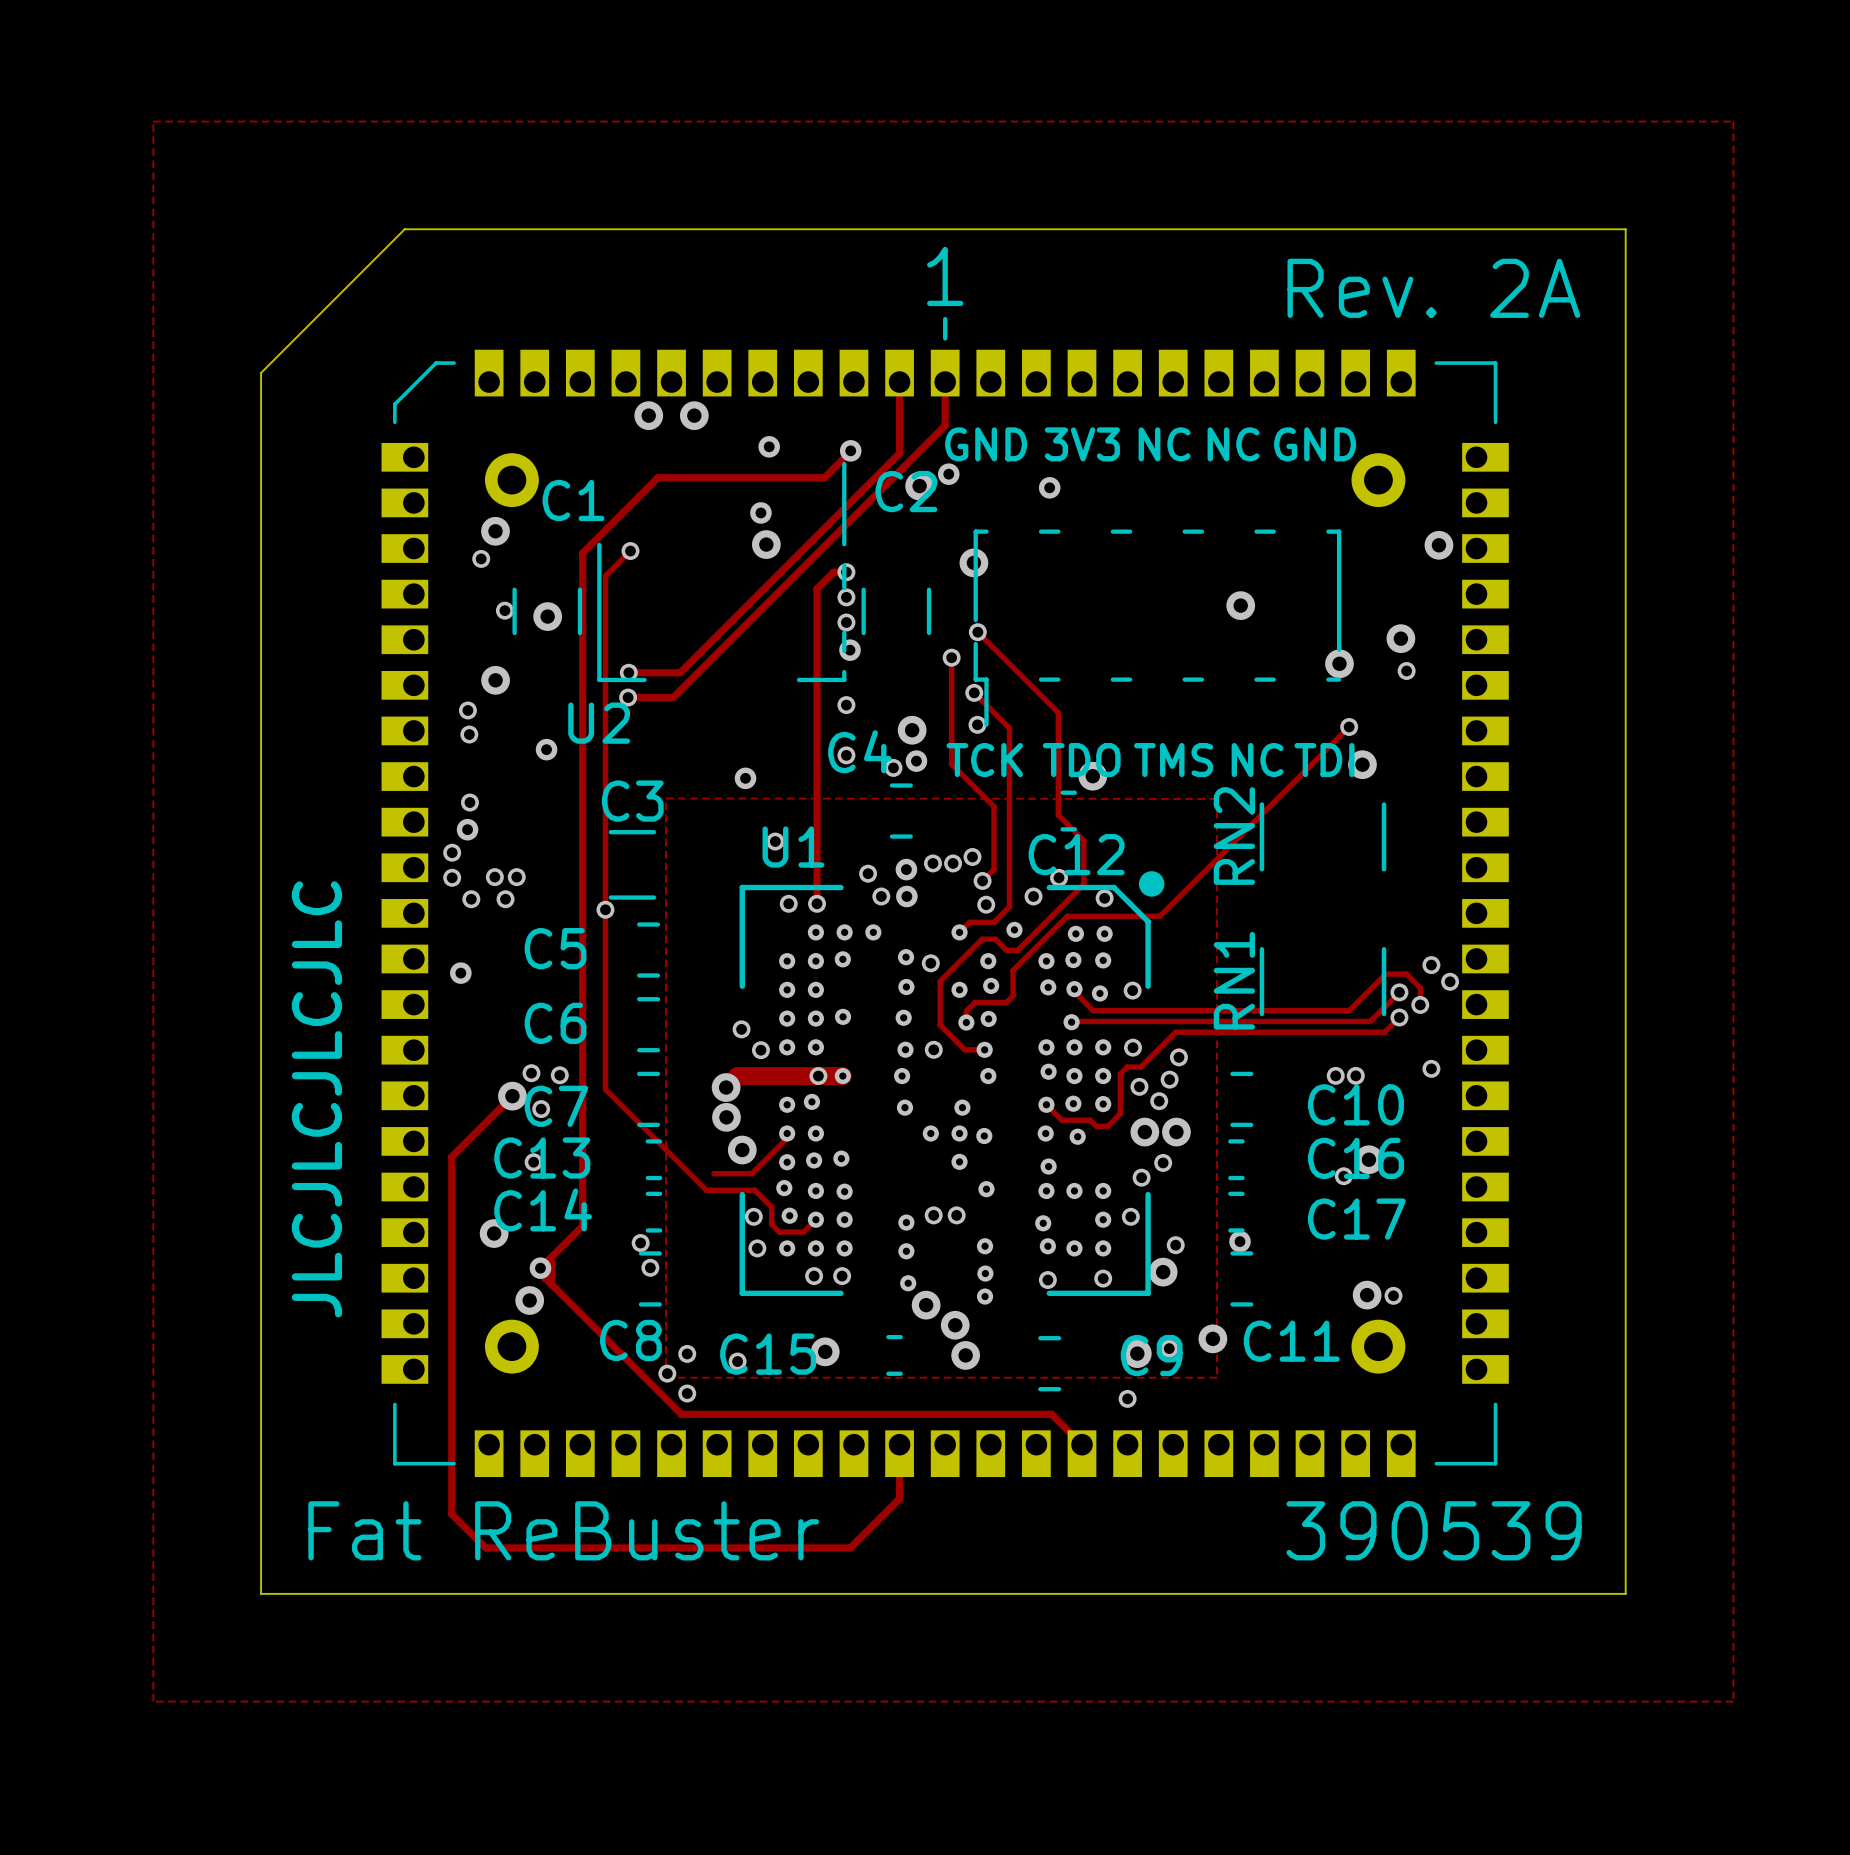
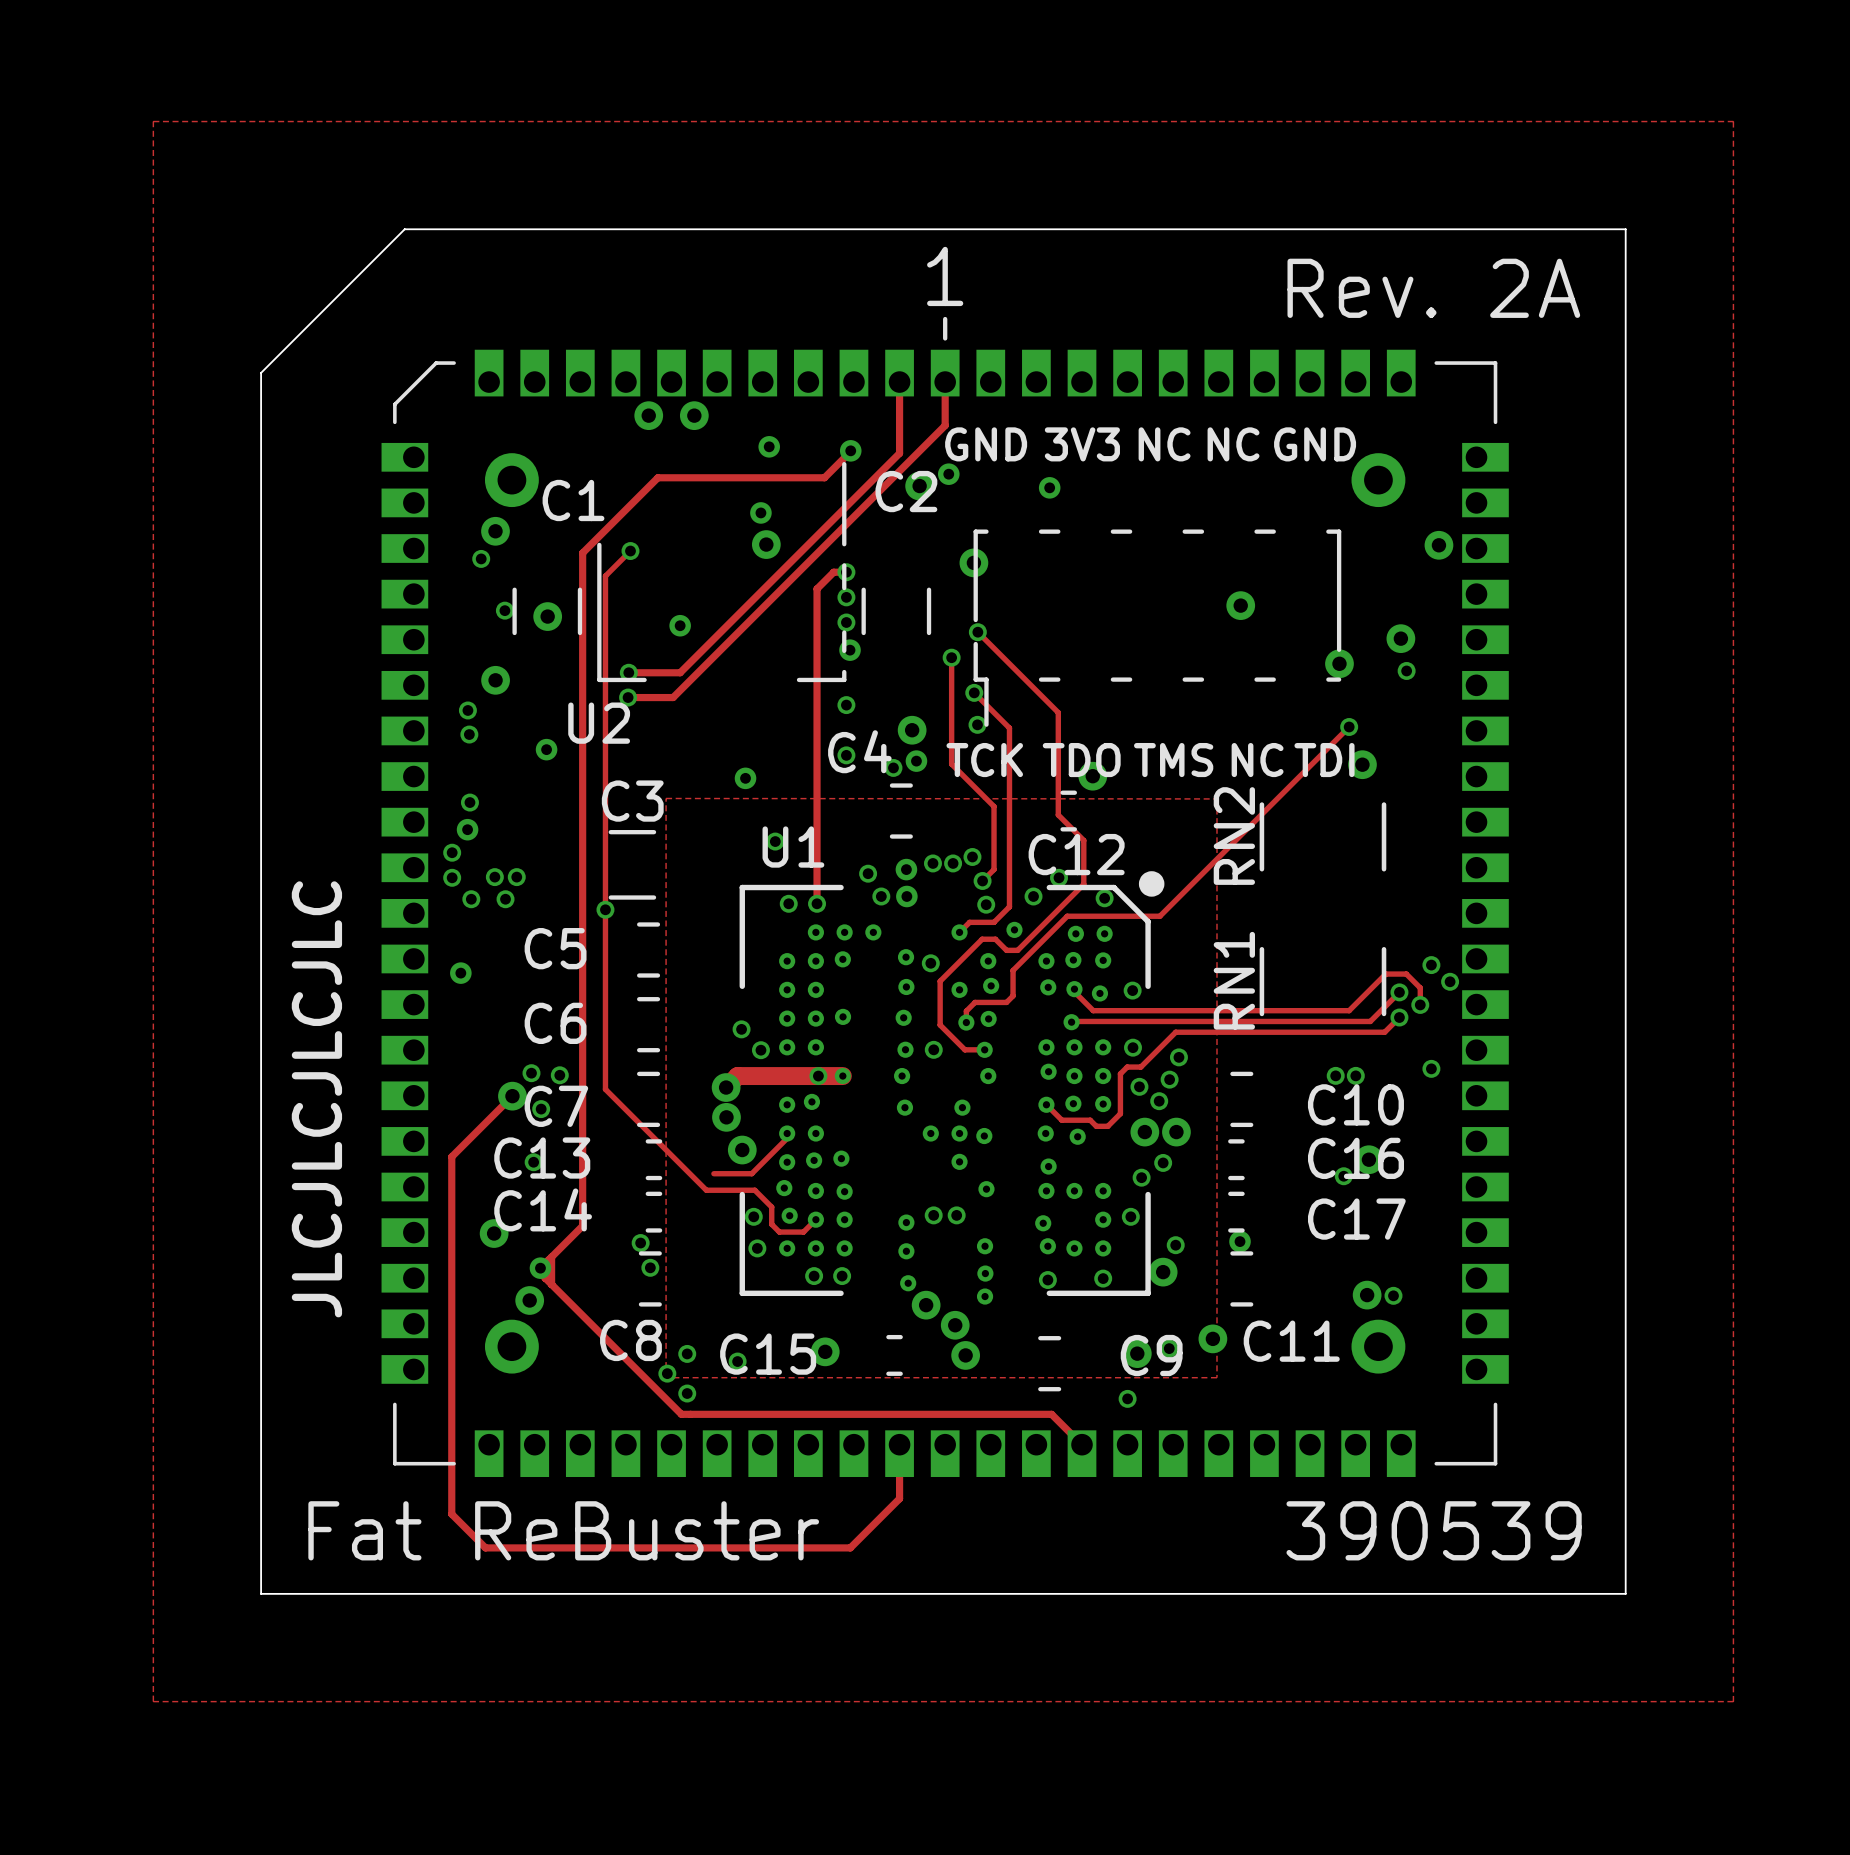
via: none -> (680, 625)

